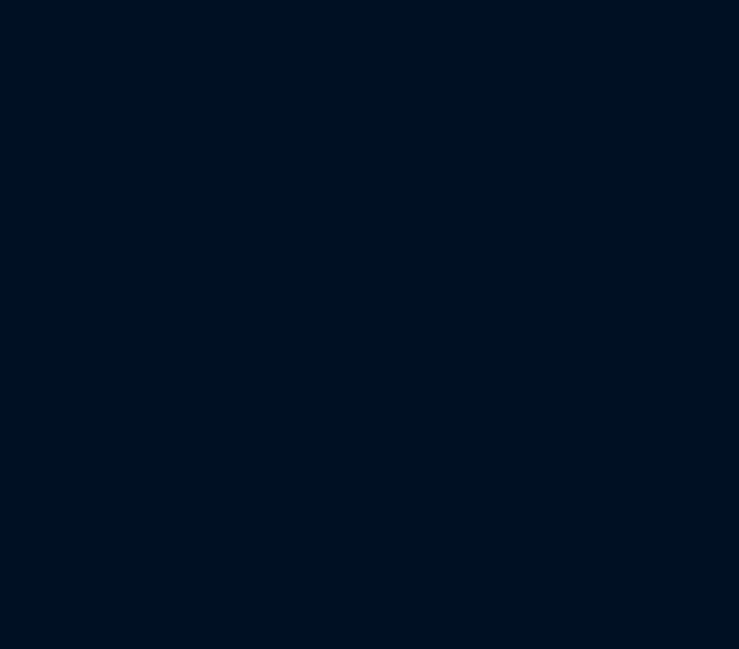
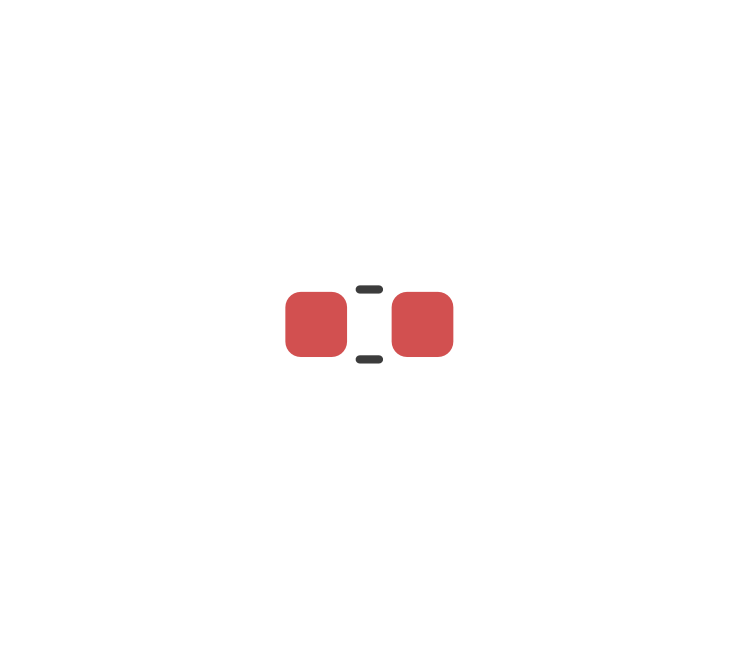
part: none -> (369, 324)

